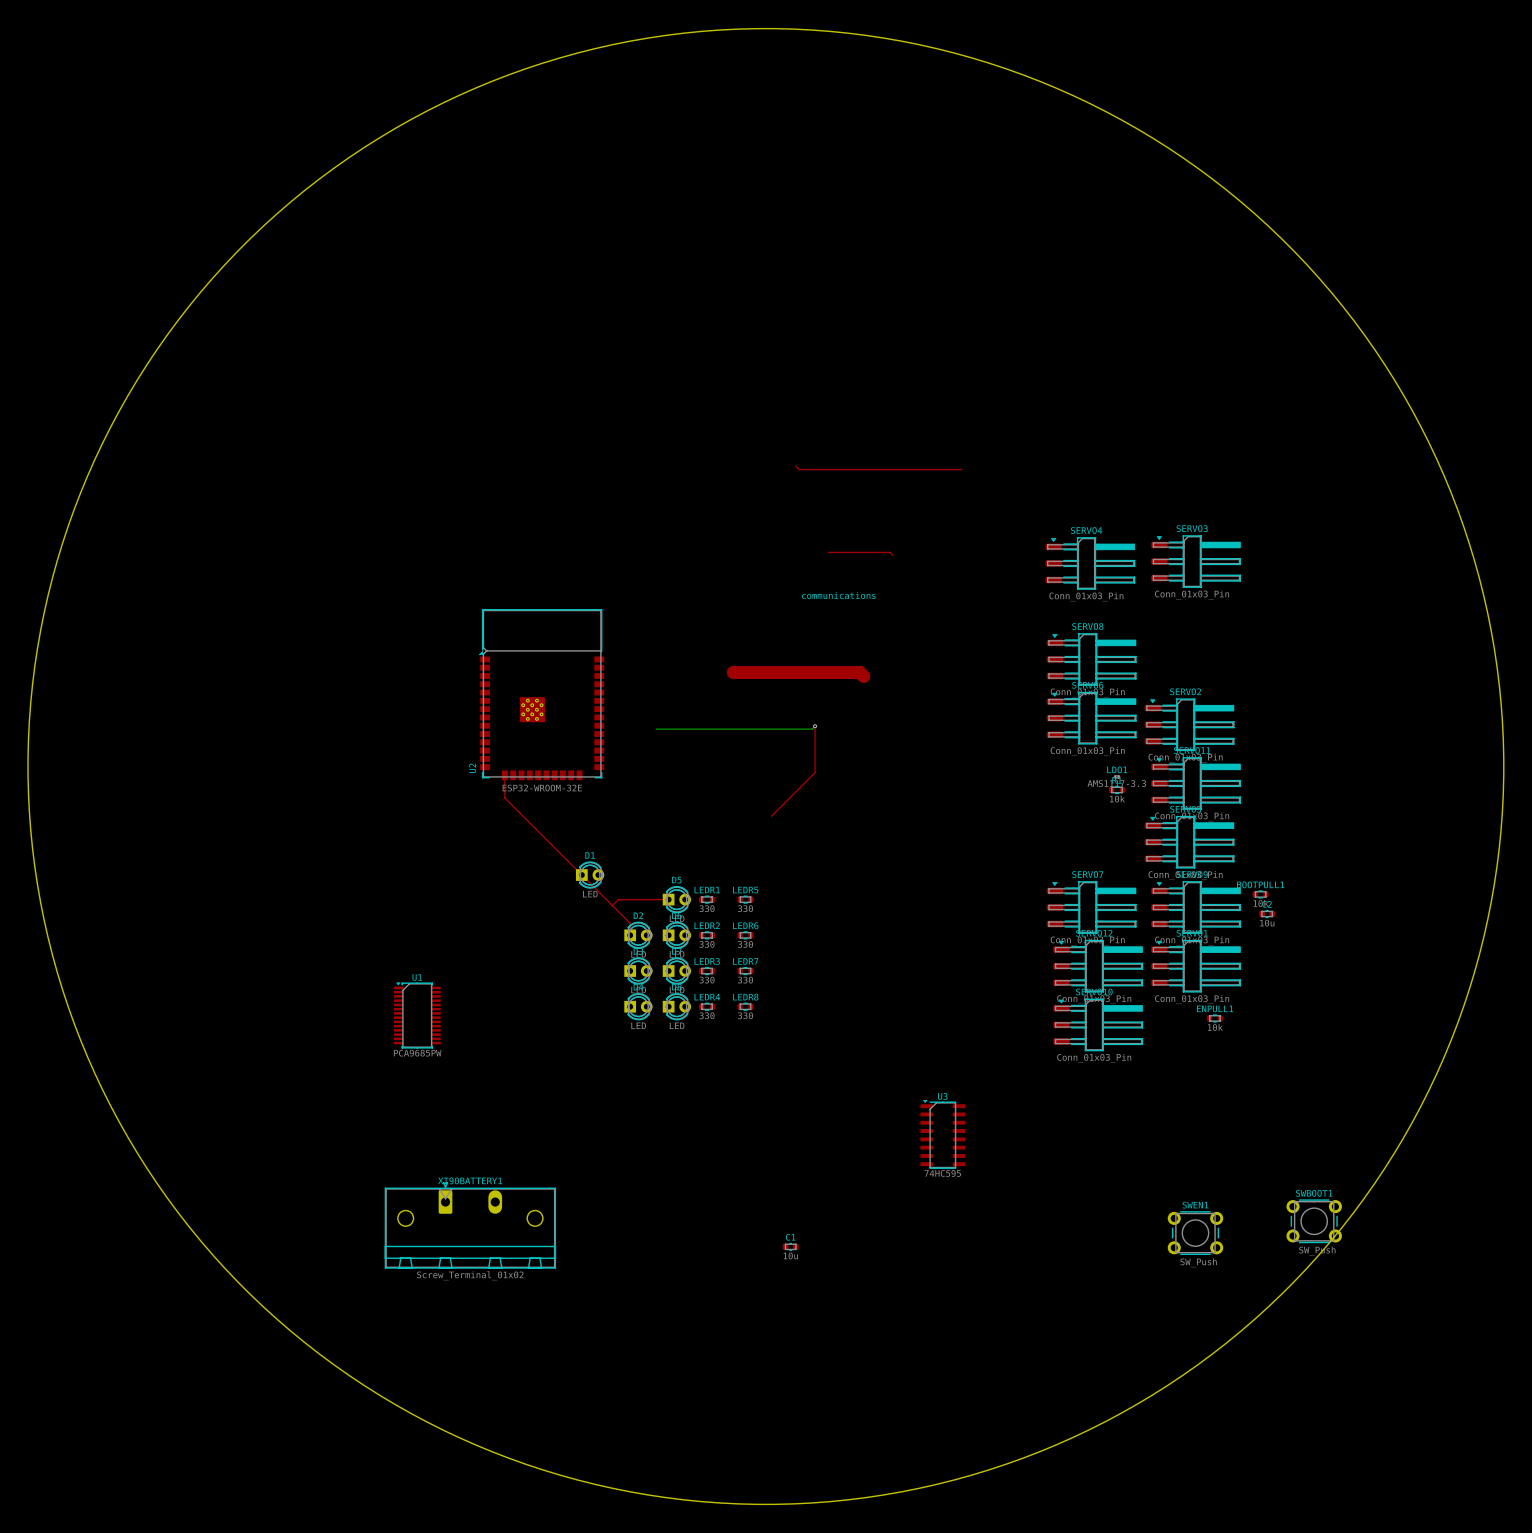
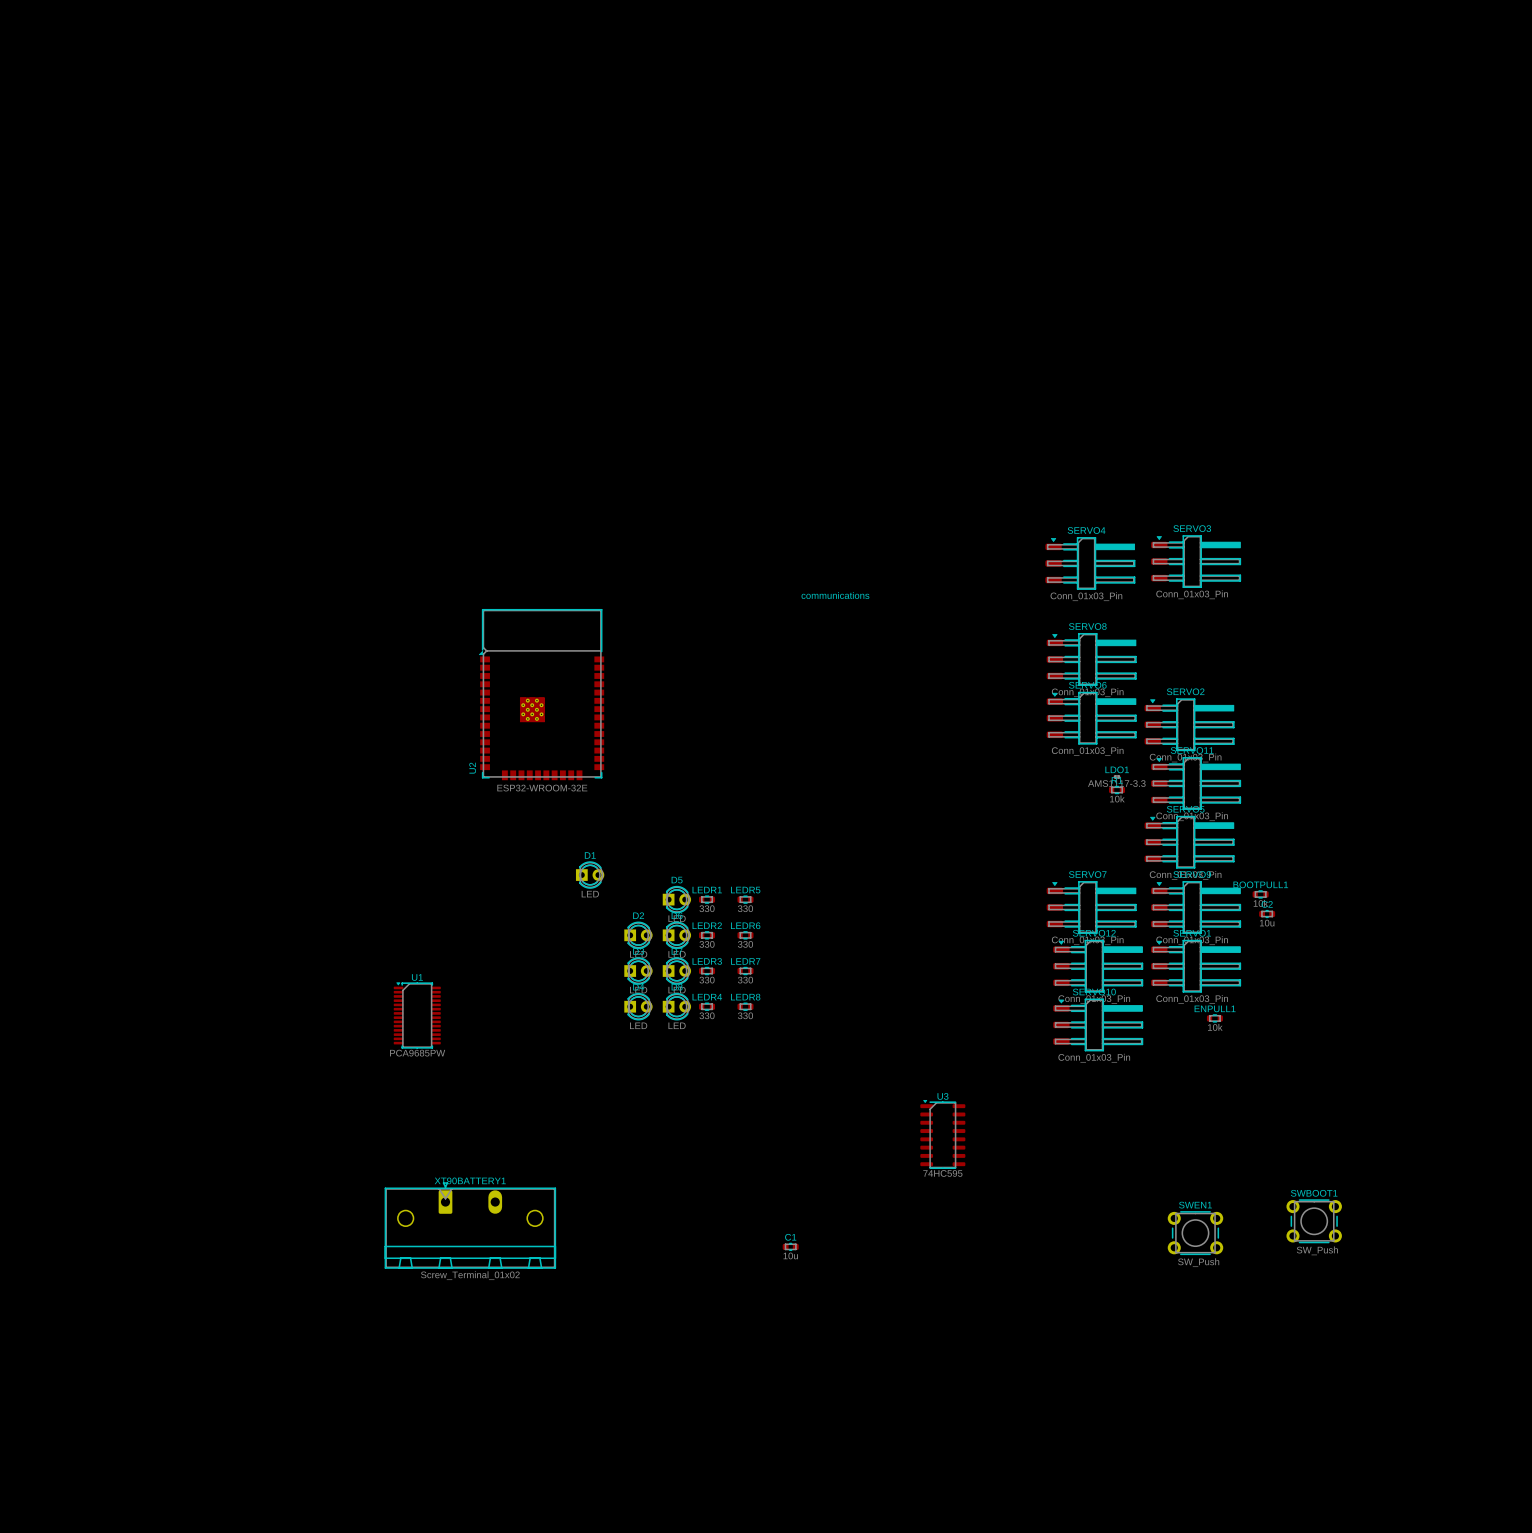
round board edge: [27, 28, 1504, 1505] -> none
top track: (795, 466) (799, 469) (961, 469) -> none
top track: (828, 552) (889, 552) (892, 555) -> none
top track: (733, 672) (859, 672) (863, 676) -> none
top track: (815, 726) (815, 772) (771, 816) -> none
bottom track: (815, 726) (812, 729) (656, 729) -> none
via: (815, 726) -> none
top track: (504, 775) (504, 798) (630, 923) (630, 935) -> none
top track: (668, 899) (618, 899) (612, 905) -> none

